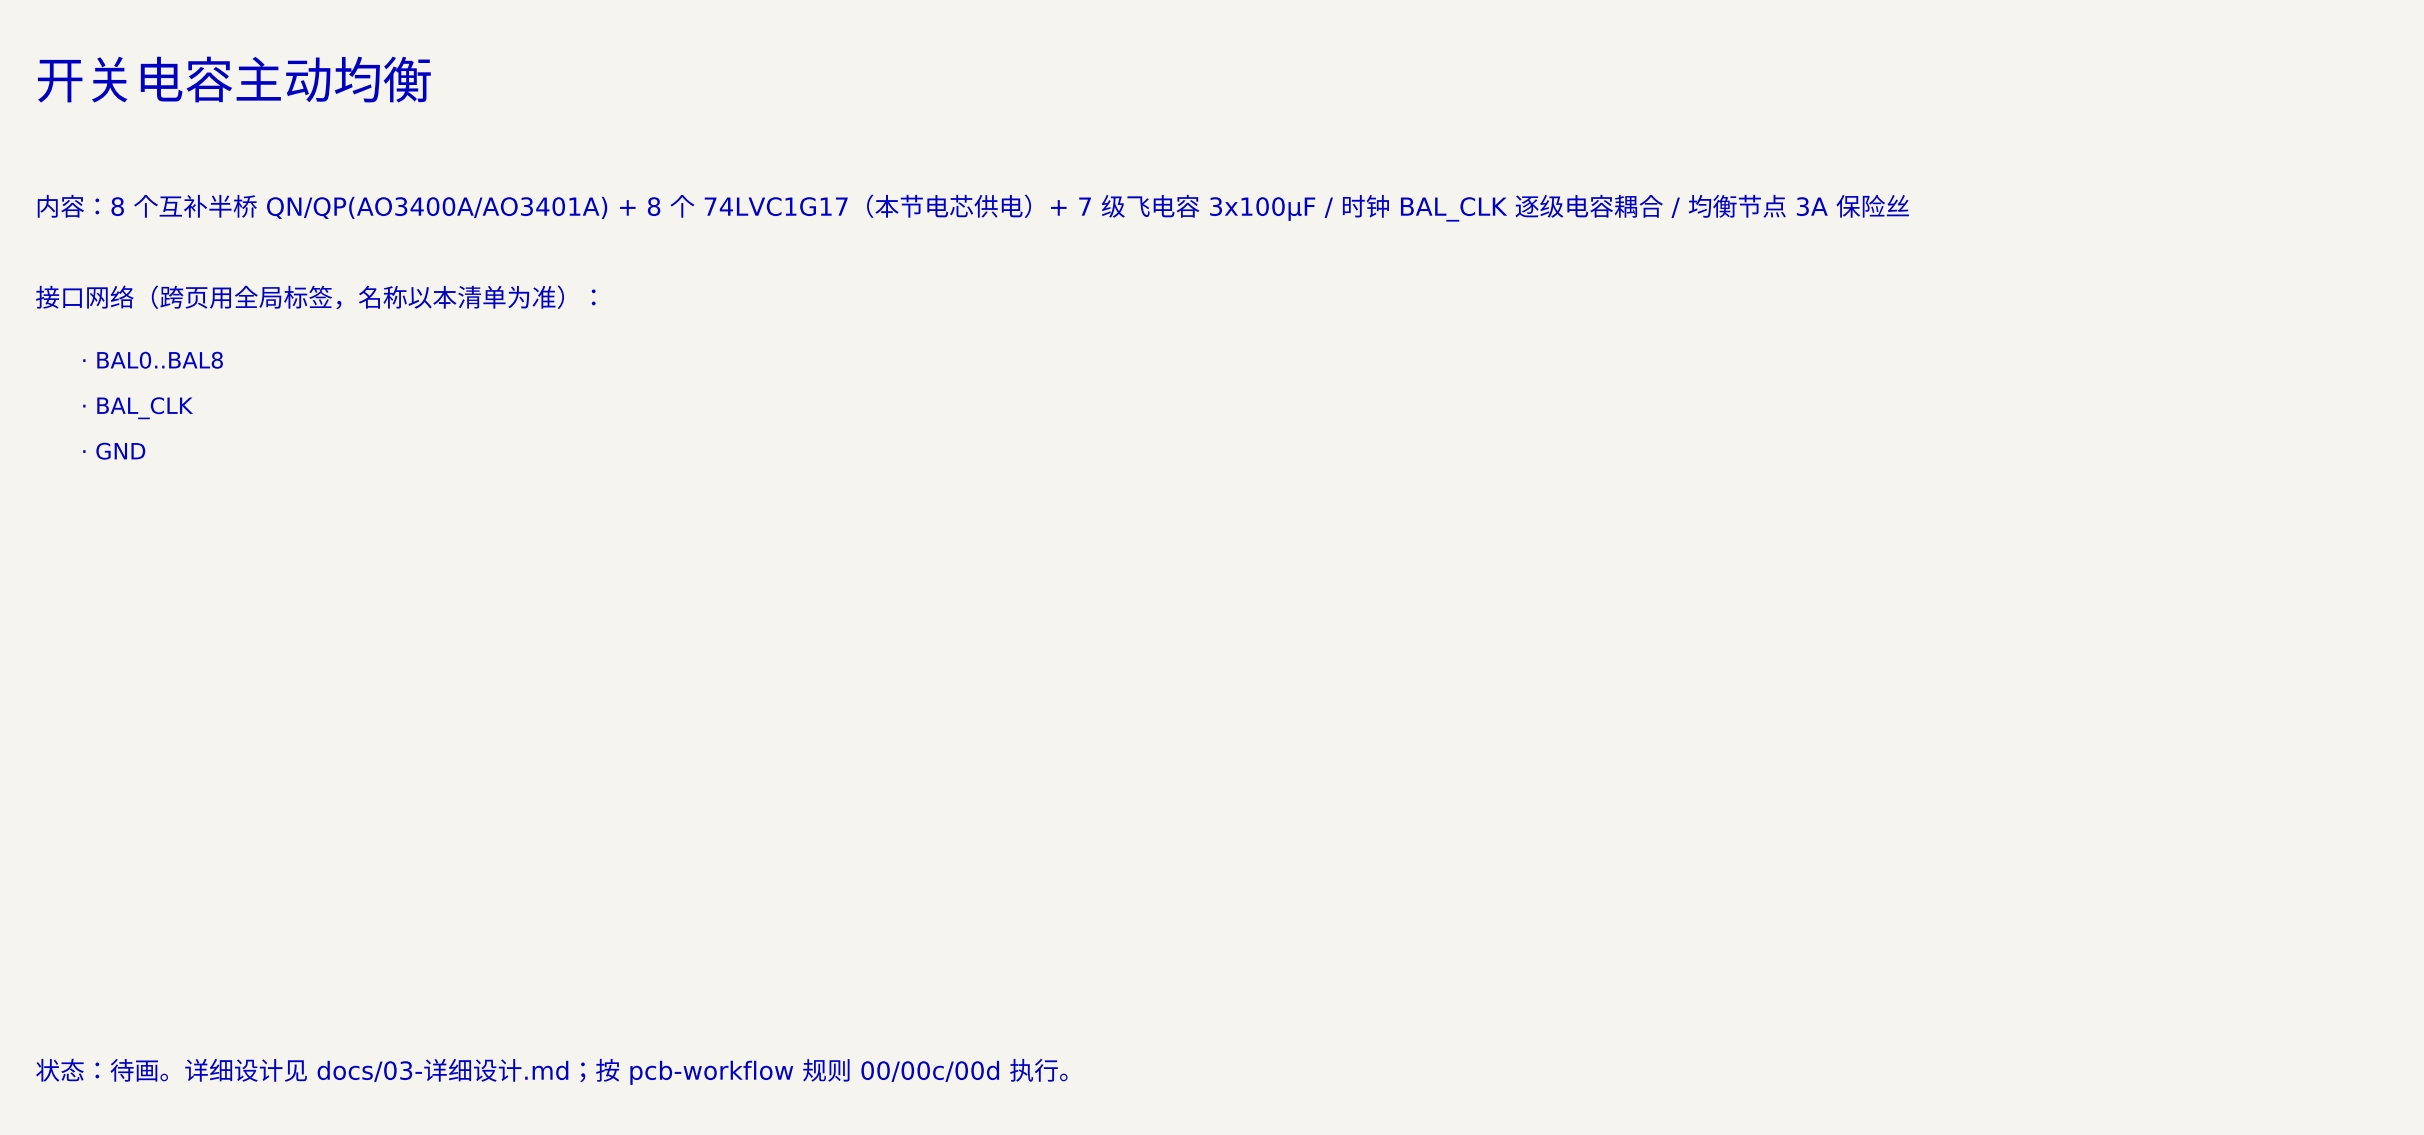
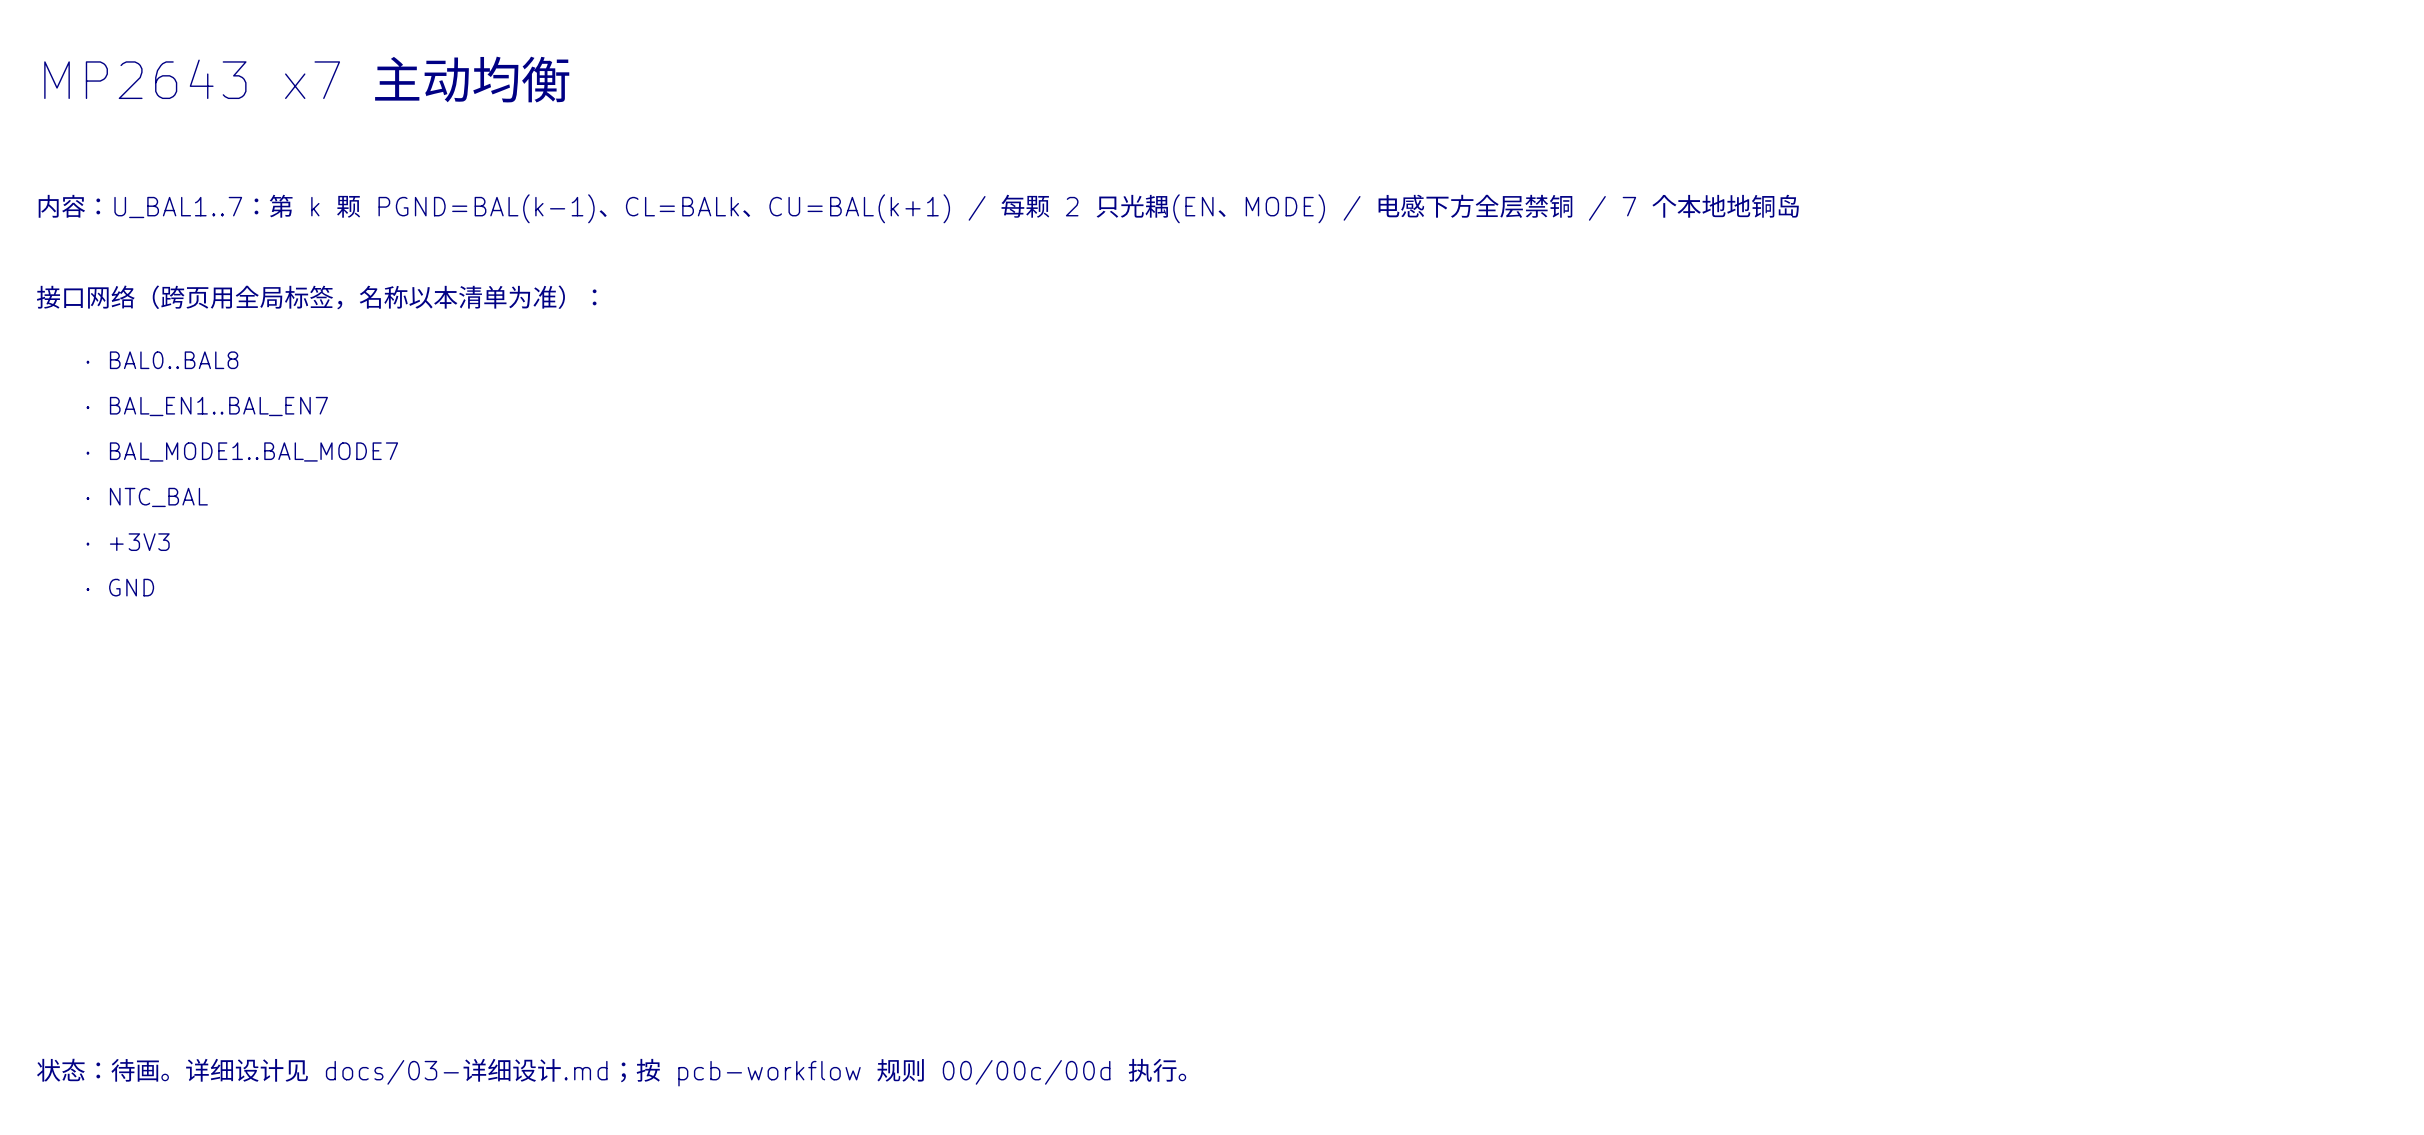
text: 开关电容主动均衡 (234, 79) -> MP2643 x7 主动均衡 (307, 79)
text: 内容：8 个互补半桥 QN/QP(AO3400A/AO3401A) + 8 个 74LVC1G17（本节电芯供电）+ 7 级飞电容 3x100µF / 时钟 BAL_CLK 逐级电容耦合 / 均衡节点 3A 保险丝 (973, 208) -> 内容：U_BAL1..7：第 k 颗 PGND=BAL(k-1)、CL=BALk、CU=BAL(k+1) / 每颗 2 只光耦(EN、MODE) / 电感下方全层禁铜 / 7 个本地地铜岛 (918, 208)
text: · BAL_CLK (138, 408) -> · BAL_EN1..BAL_EN7 (207, 406)
text: · GND (114, 451) -> · BAL_MODE1..BAL_MODE7 (242, 451)
text: none -> · NTC_BAL (147, 497)
text: none -> · +3V3 (128, 542)
text: none -> · GND (120, 587)

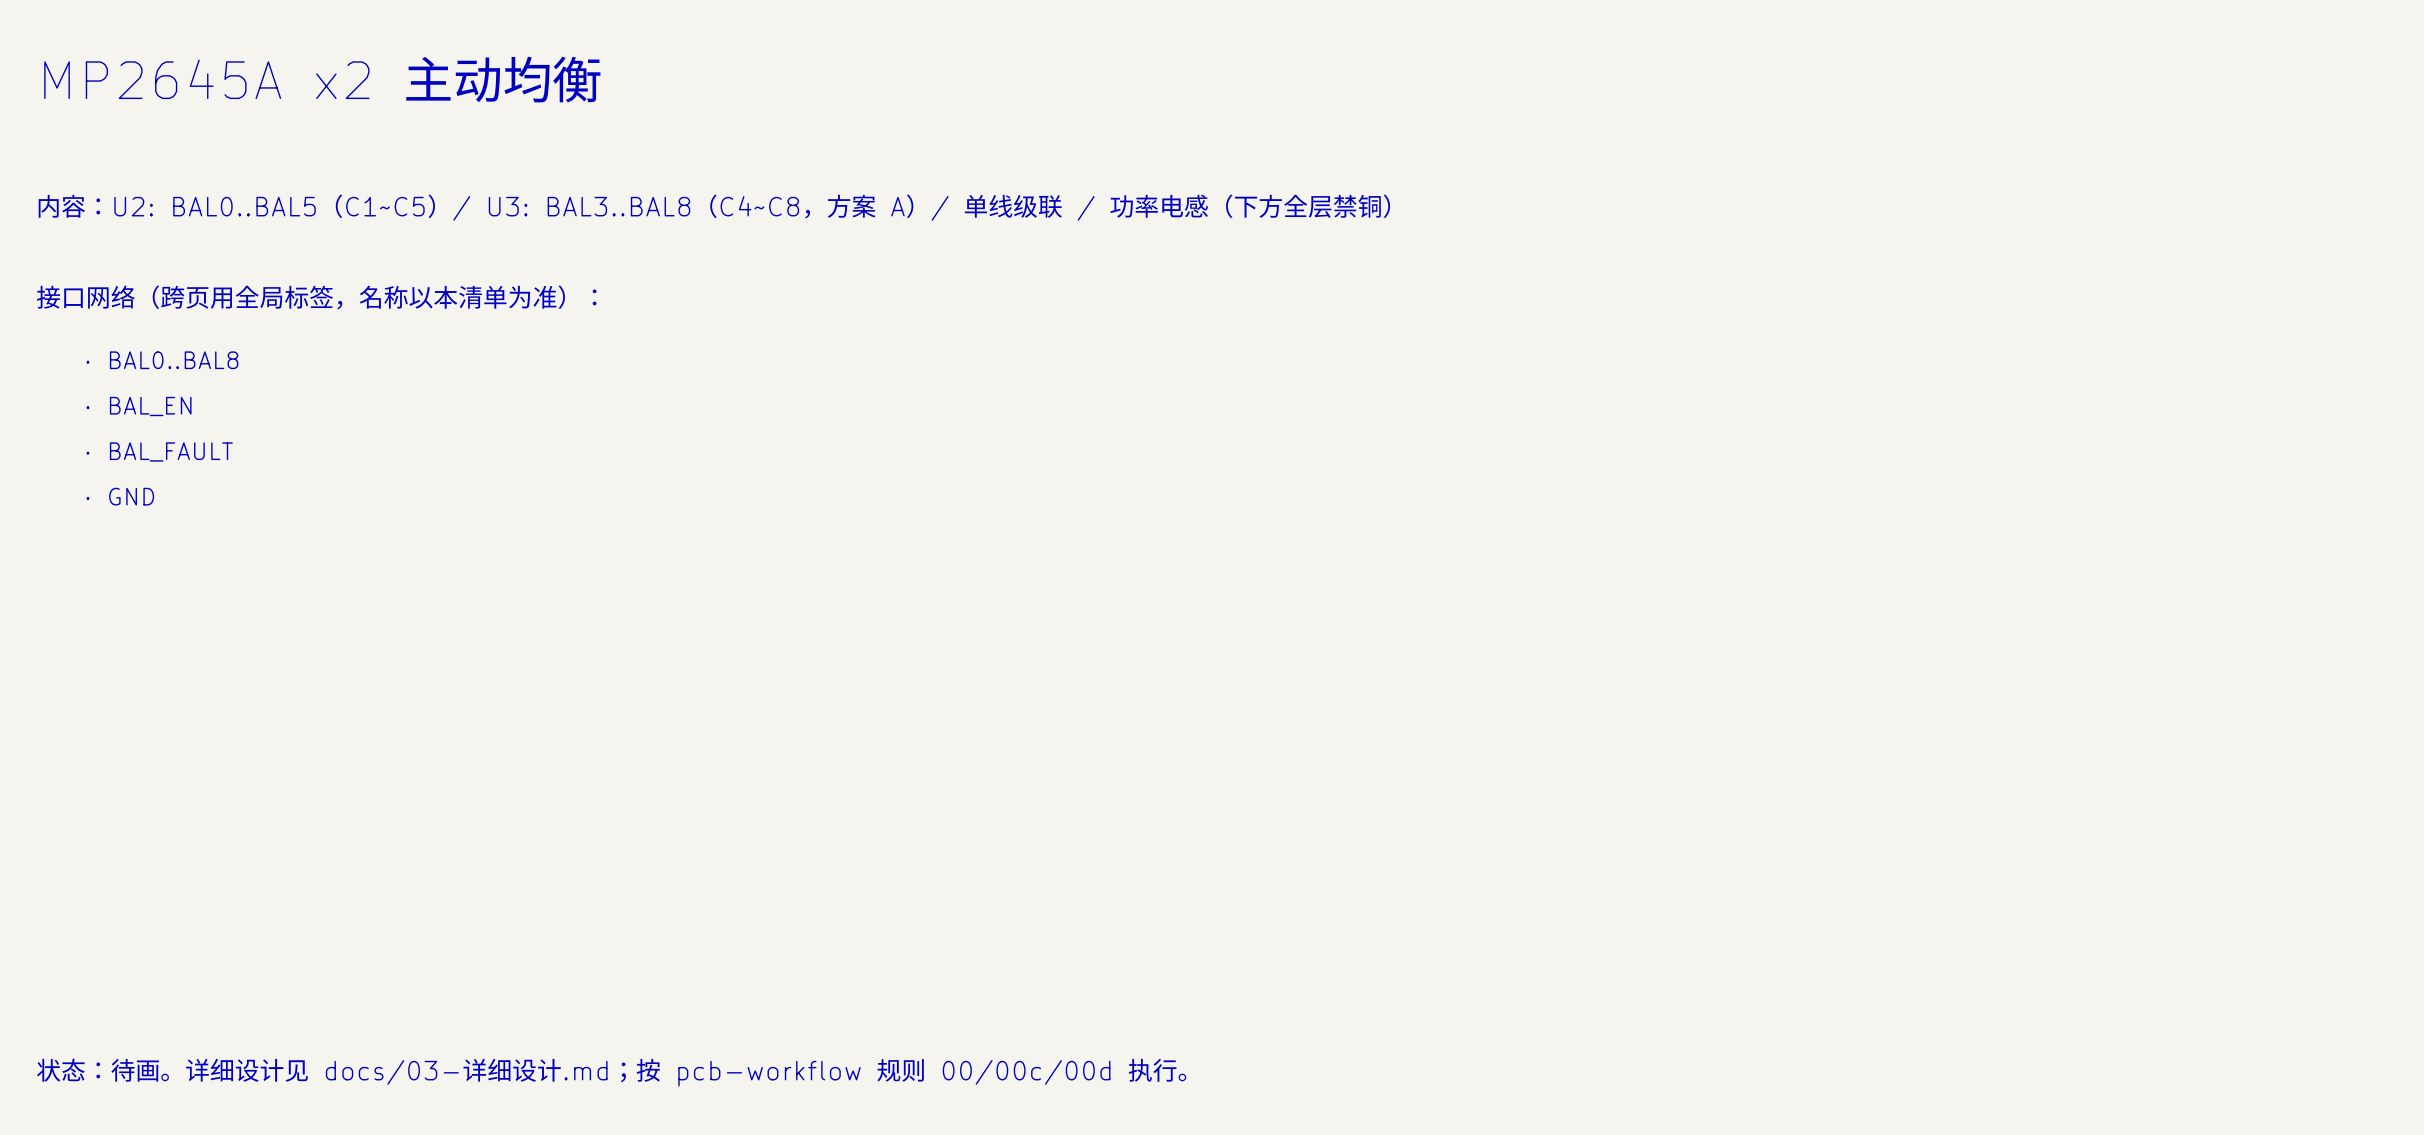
text: MP2643 x7 主动均衡 (307, 79) -> MP2645A x2 主动均衡 (322, 79)
text: 内容：U_BAL1..7：第 k 颗 PGND=BAL(k-1)、CL=BALk、CU=BAL(k+1) / 每颗 2 只光耦(EN、MODE) / 电感下方全层禁铜 / 7 个本地地铜岛 (918, 208) -> 内容：U2: BAL0..BAL5（C1~C5）/ U3: BAL3..BAL8（C4~C8，方案 A）/ 单线级联 / 功率电感（下方全层禁铜） (714, 207)
text: · BAL_EN1..BAL_EN7 (207, 406) -> · BAL_EN (139, 406)
text: · BAL_MODE1..BAL_MODE7 (242, 451) -> · BAL_FAULT (159, 451)
text: · NTC_BAL (147, 497) -> · GND (120, 496)
text: · +3V3 (128, 542) -> none
text: · GND (120, 587) -> none

